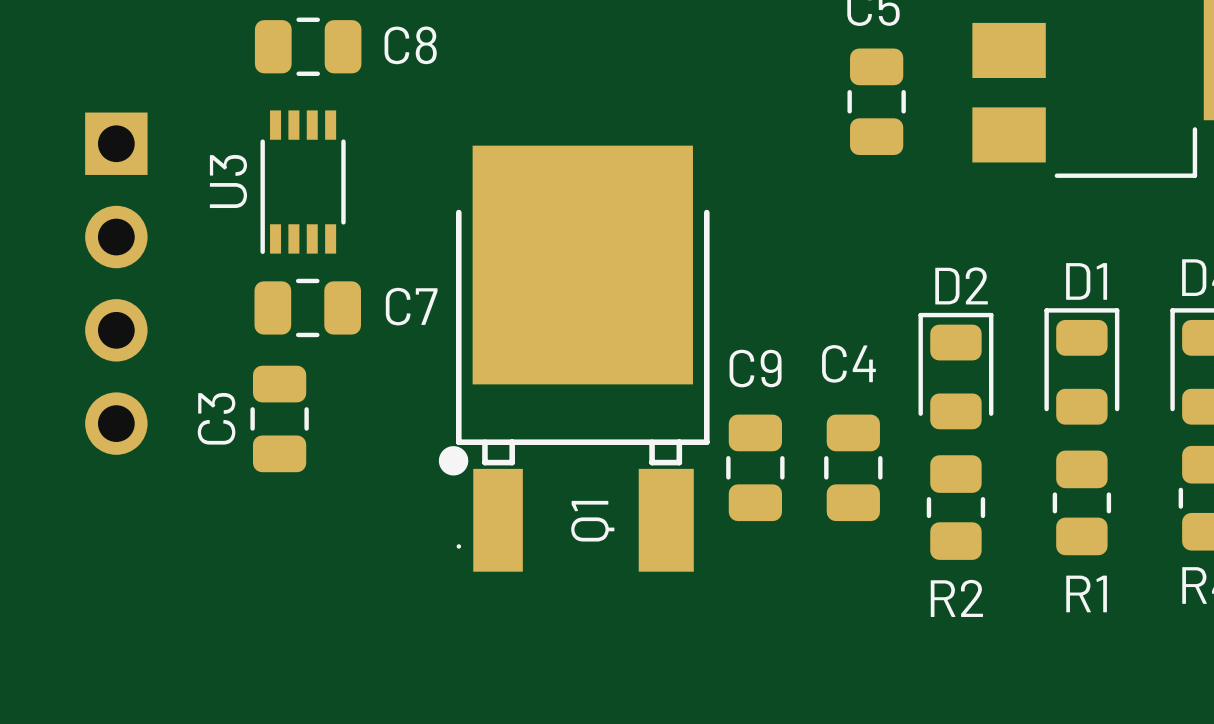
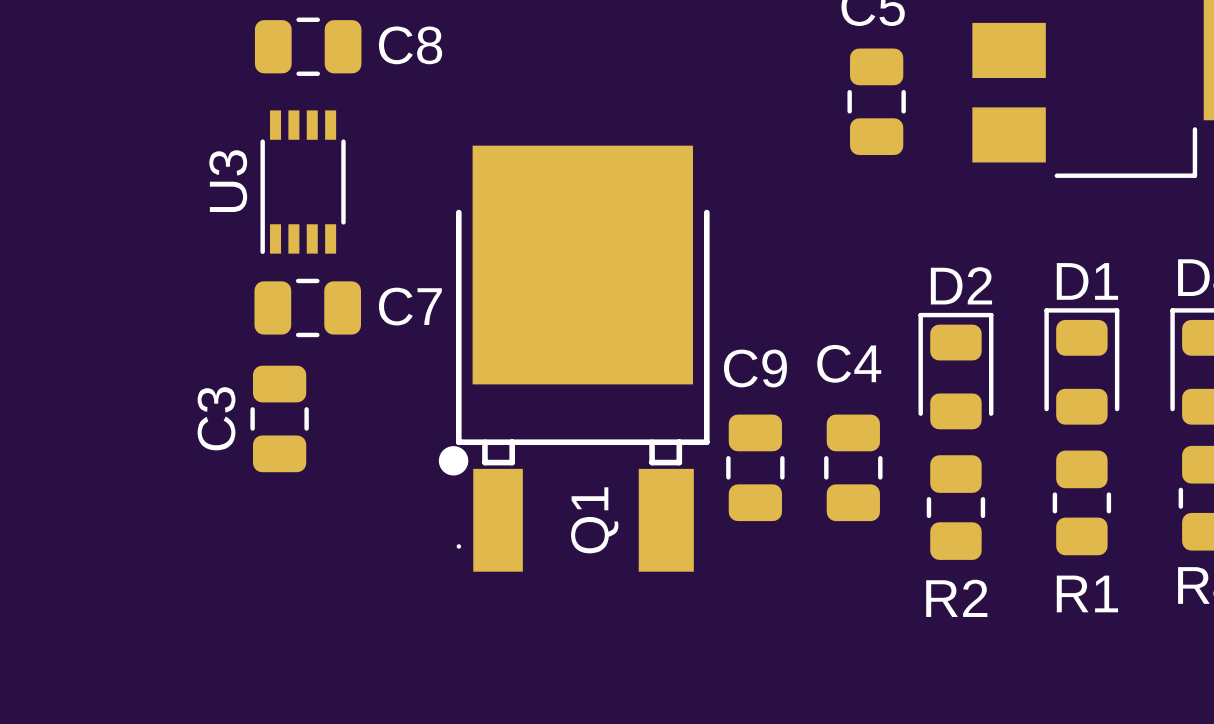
part: (116, 283) -> none

